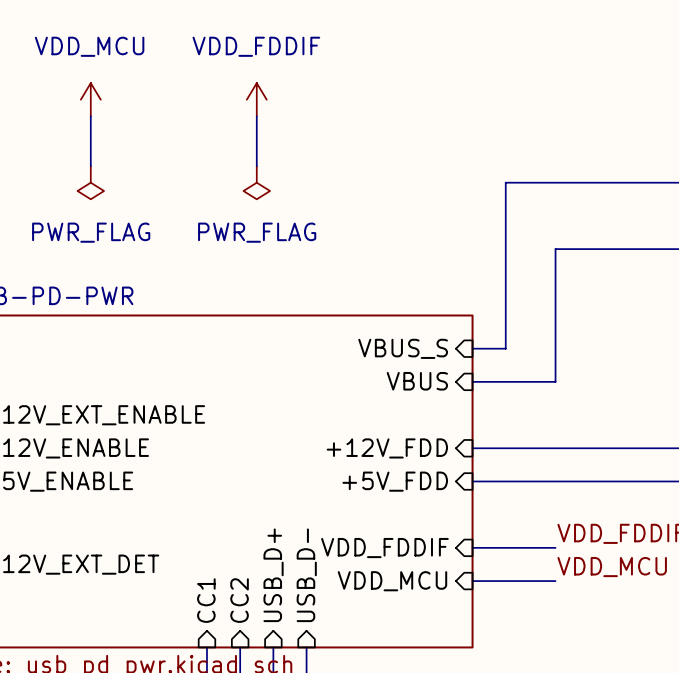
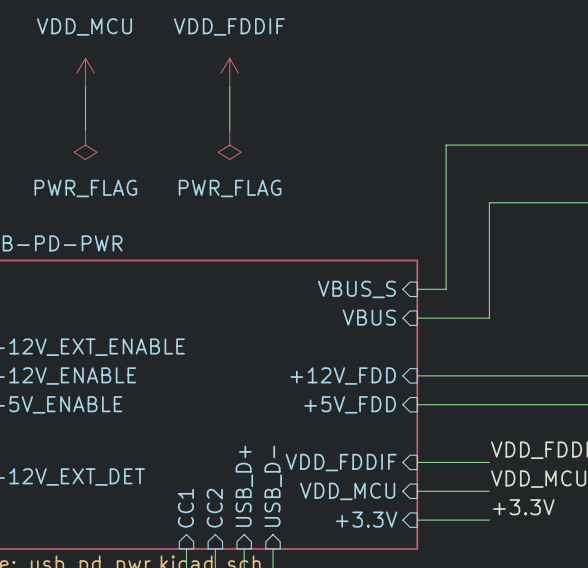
label: none -> +3.3V (523, 507)
sheet pin: none -> +3.3V (366, 519)
wire: none -> (417, 520) (489, 520)

